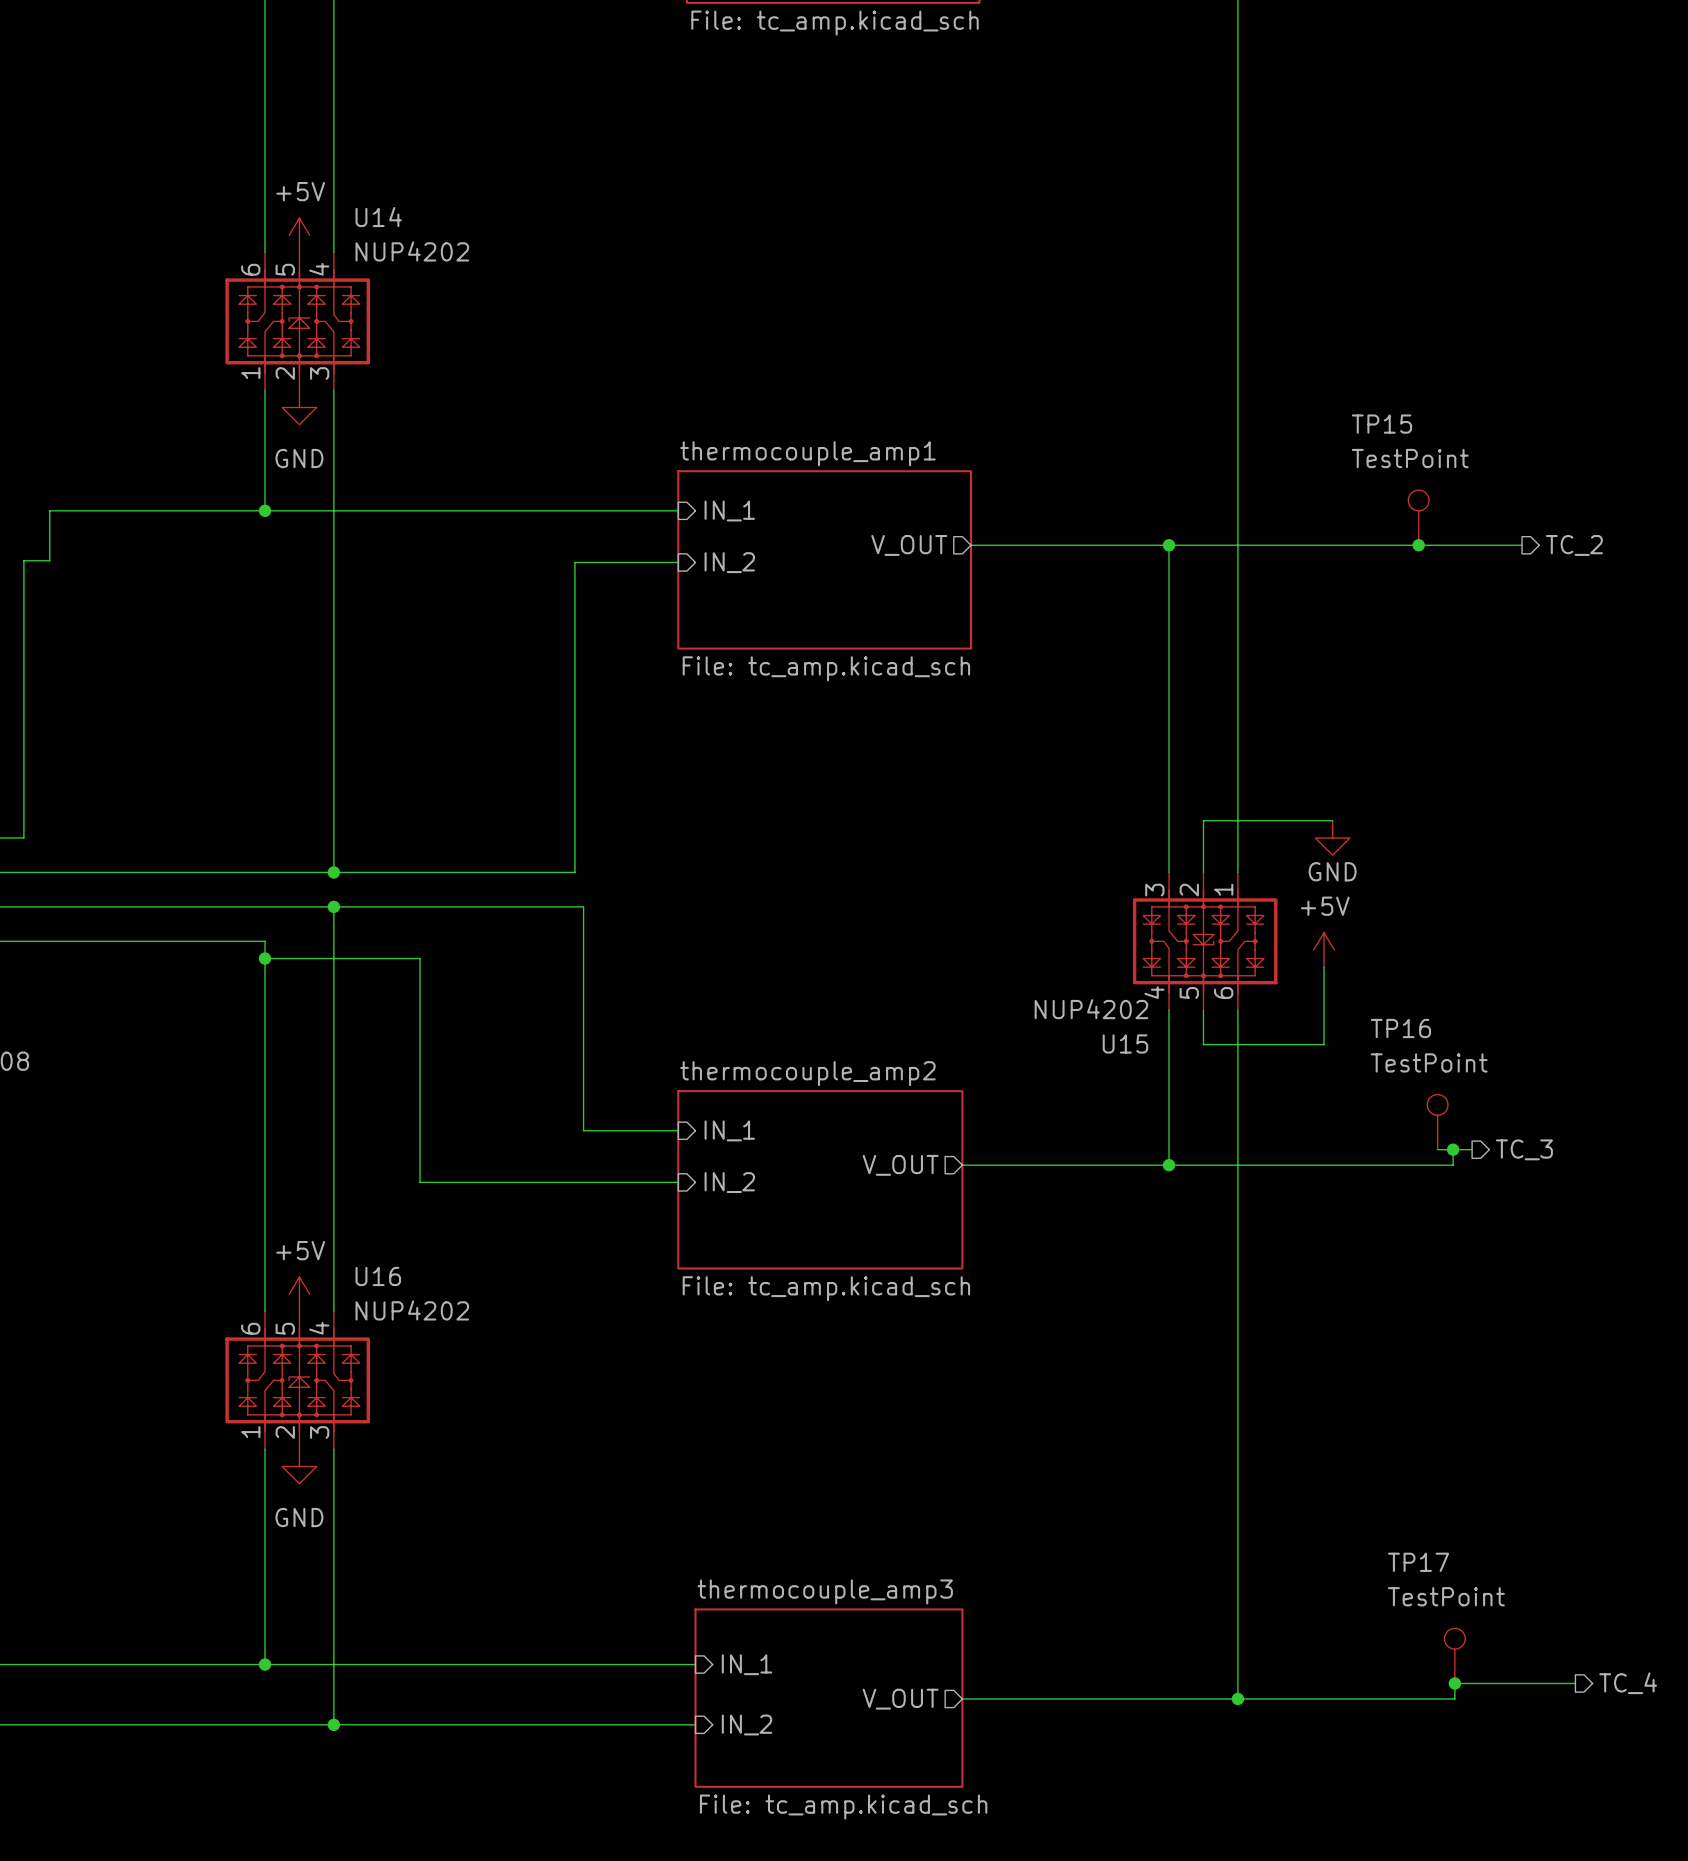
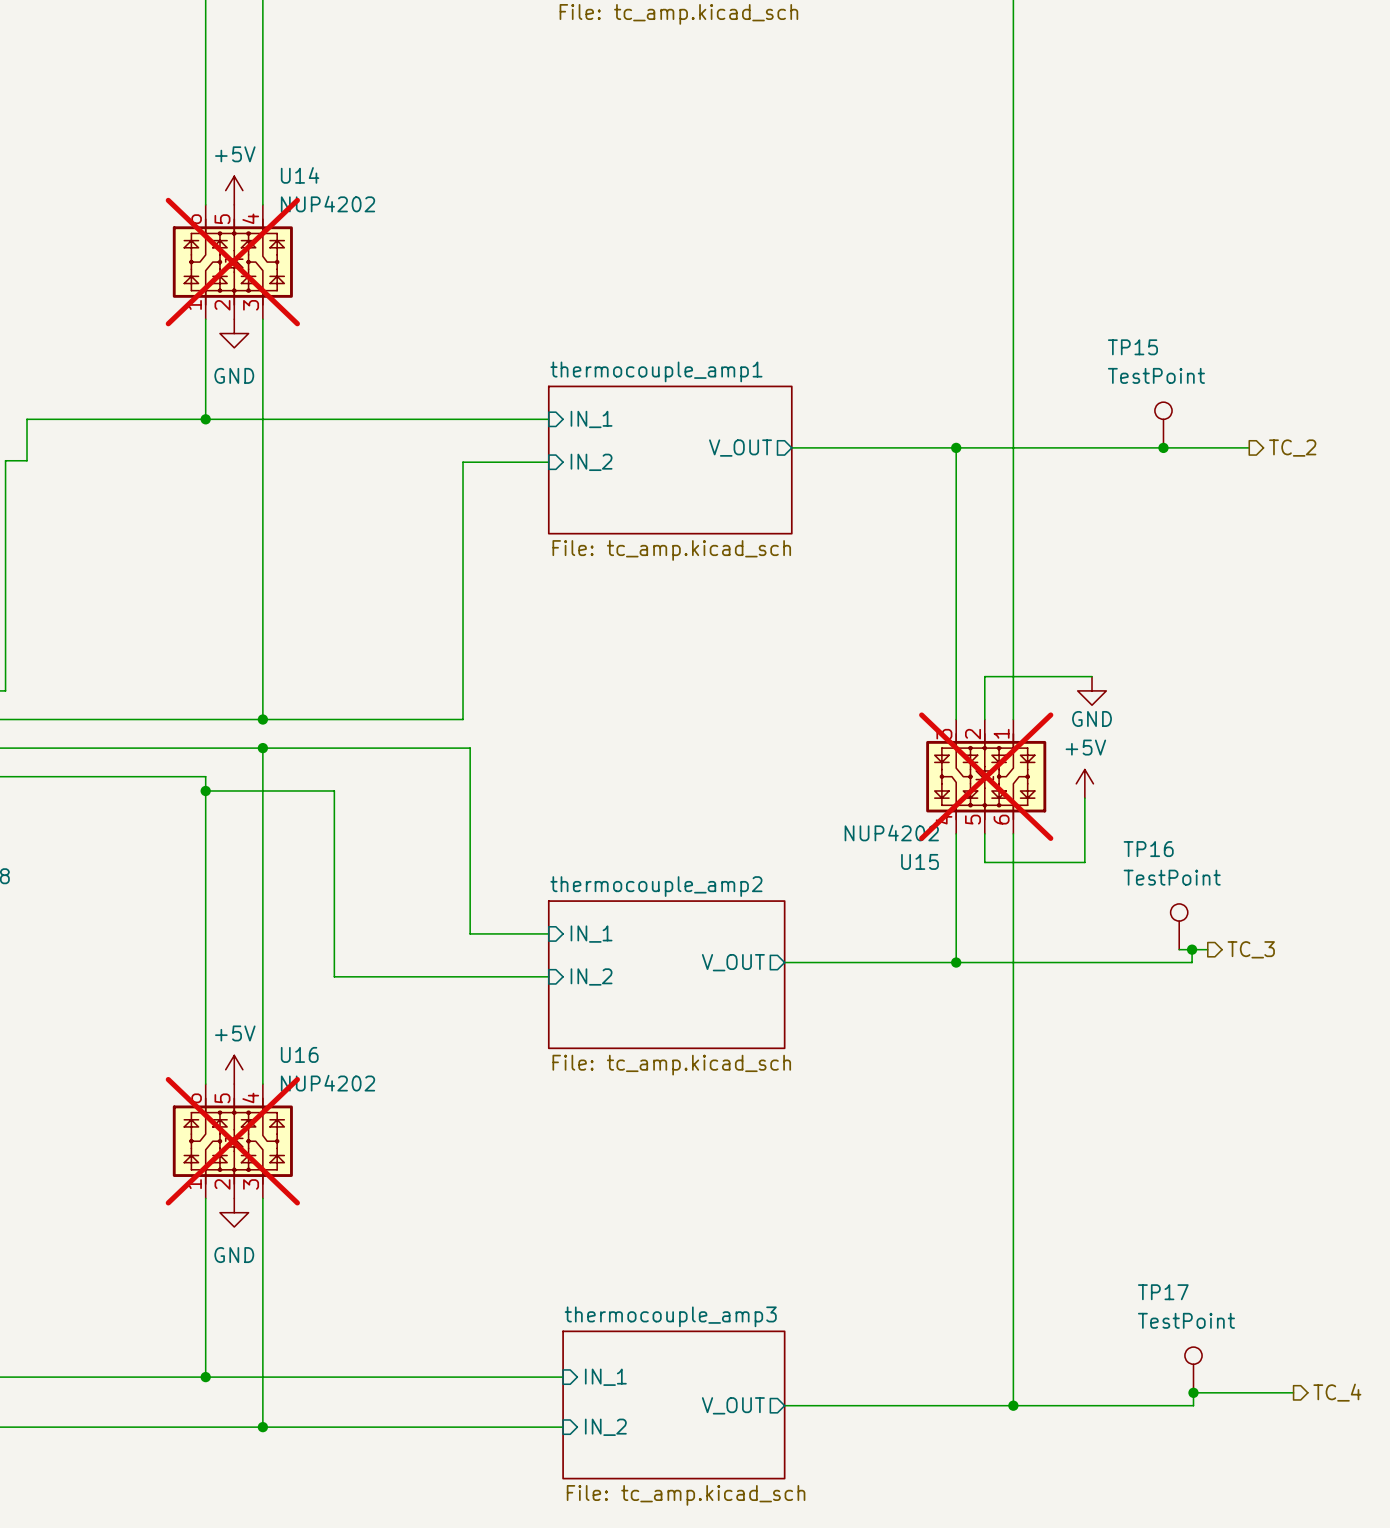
U14 do-not-place cross: none -> (232, 262)
U15 do-not-place cross: none -> (986, 776)
U16 do-not-place cross: none -> (232, 1141)

